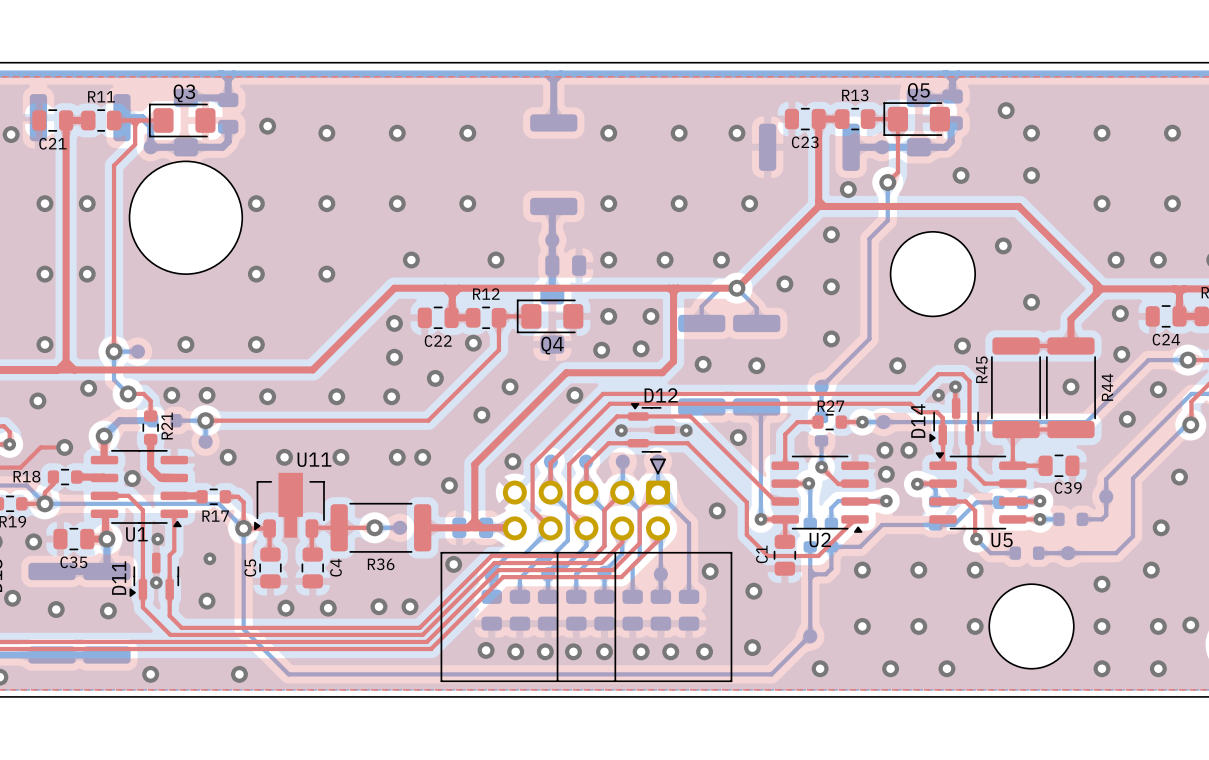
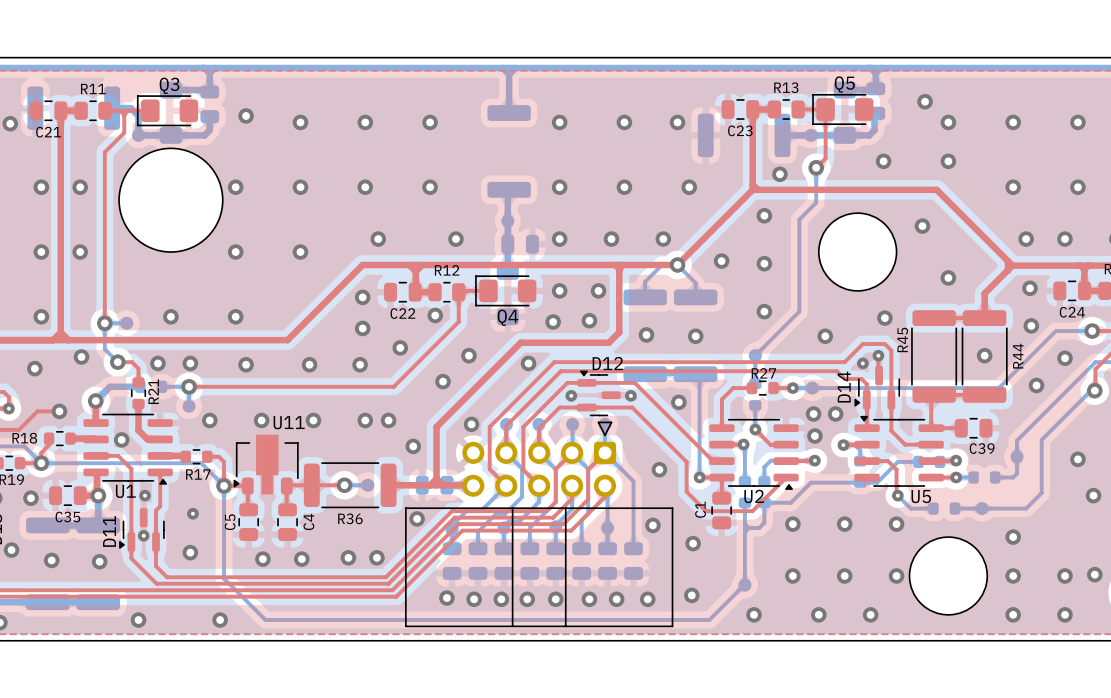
via: (1179, 477) -> none
via: none -> (1077, 459)
via: (1161, 527) -> none
via: none -> (1093, 495)
via: (1151, 570) -> none

